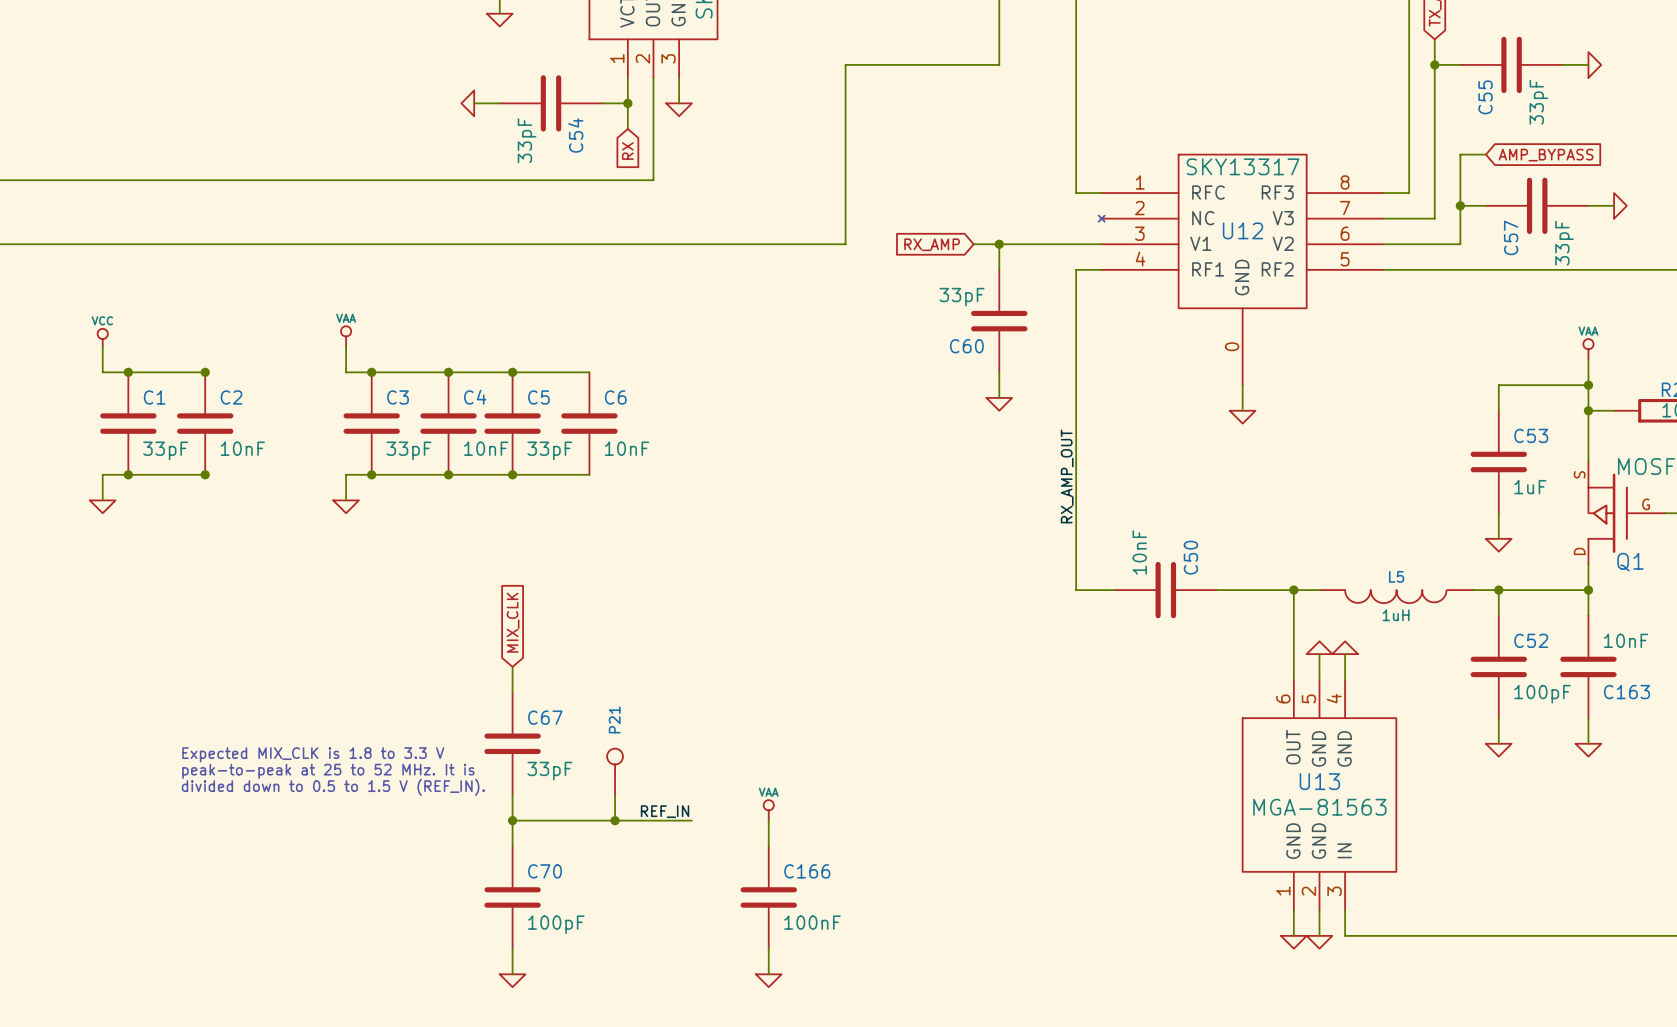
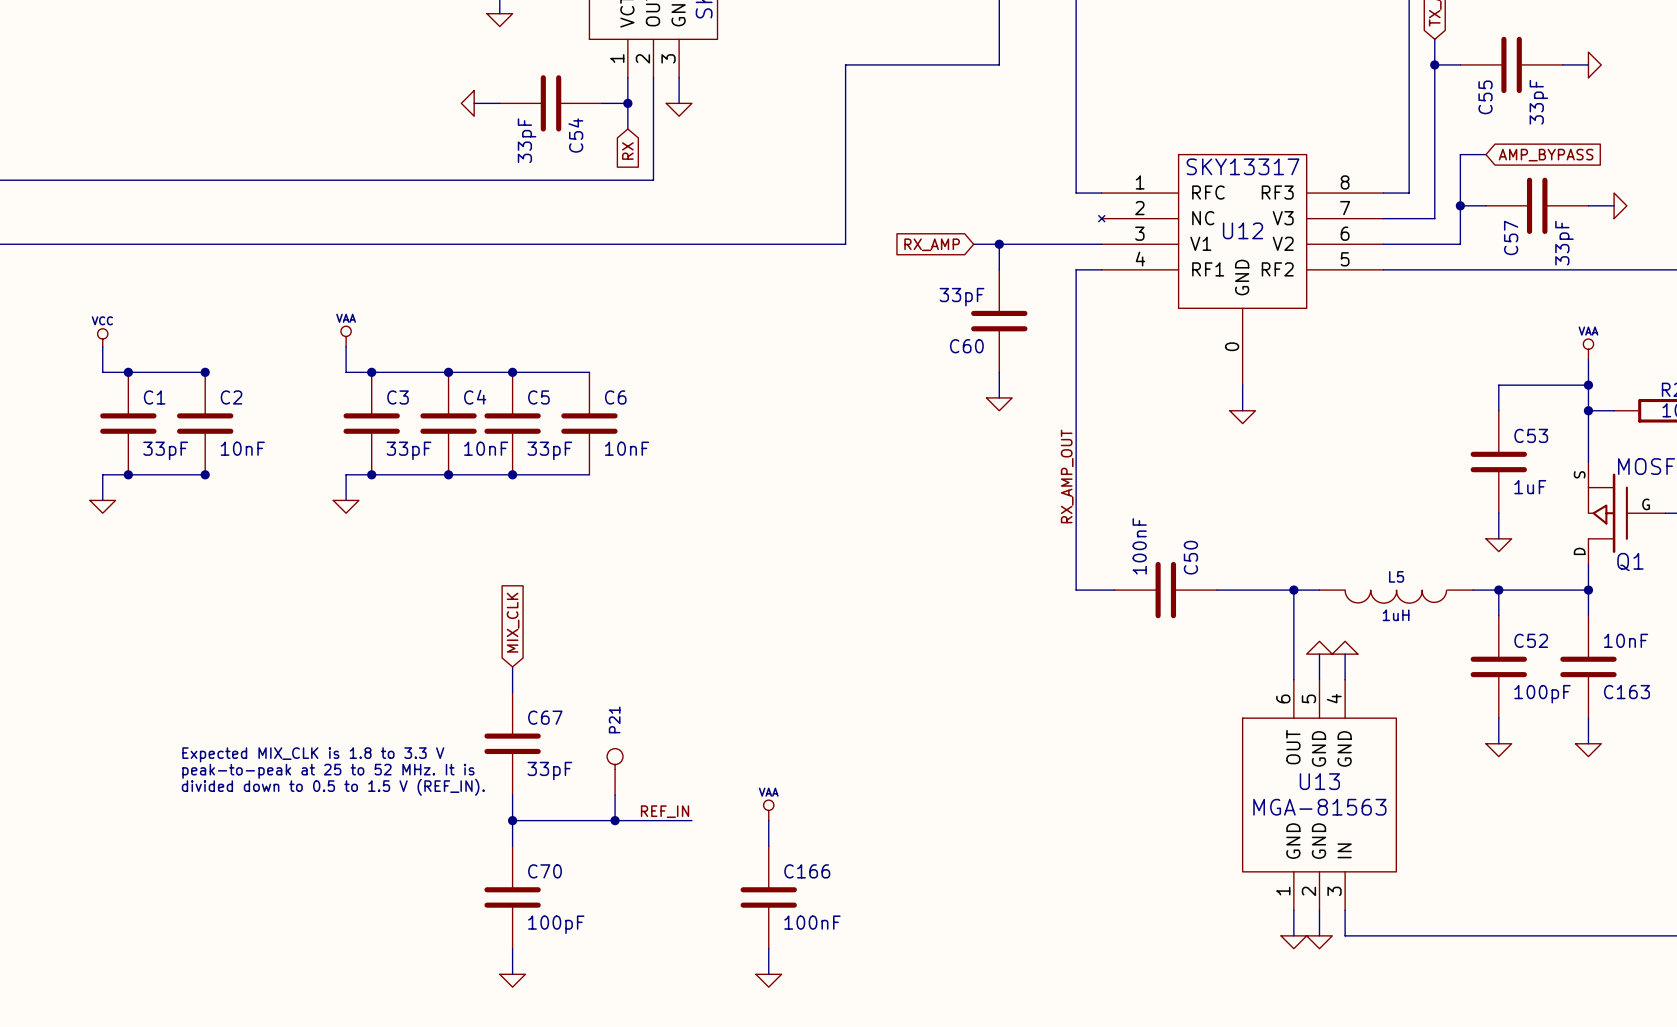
C50 value: 10nF (1139, 552) -> 100nF (1139, 546)

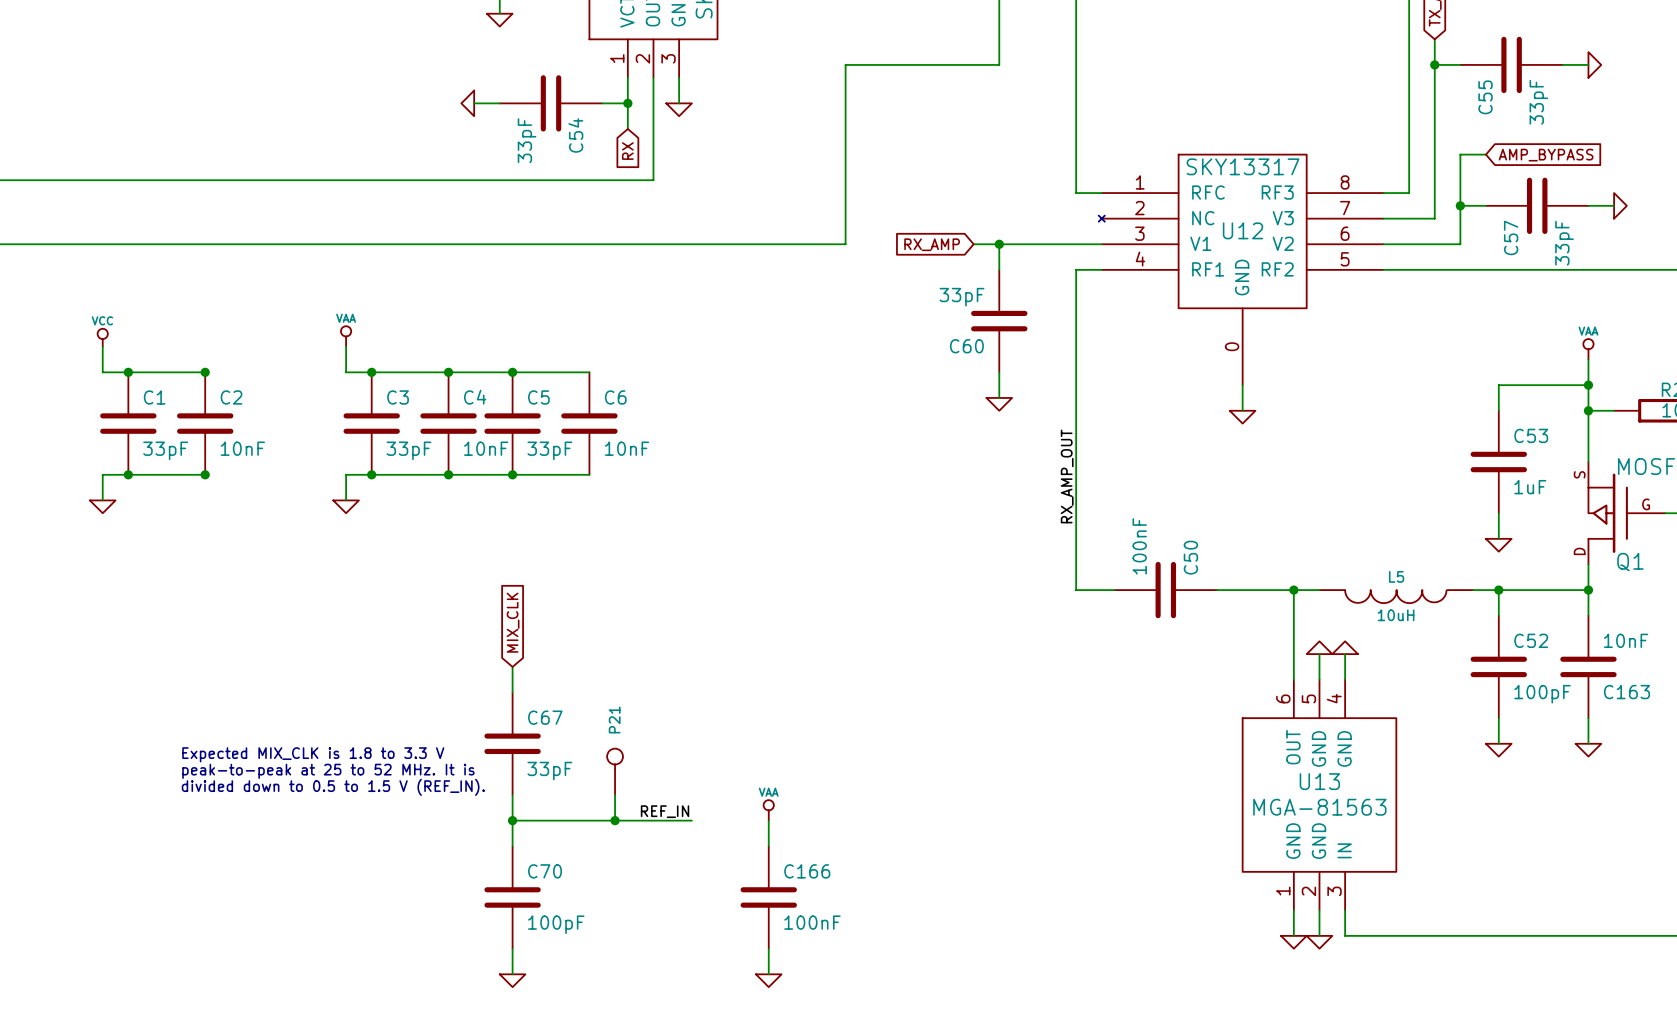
L5 value: 1uH (1396, 615) -> 10uH (1396, 615)

